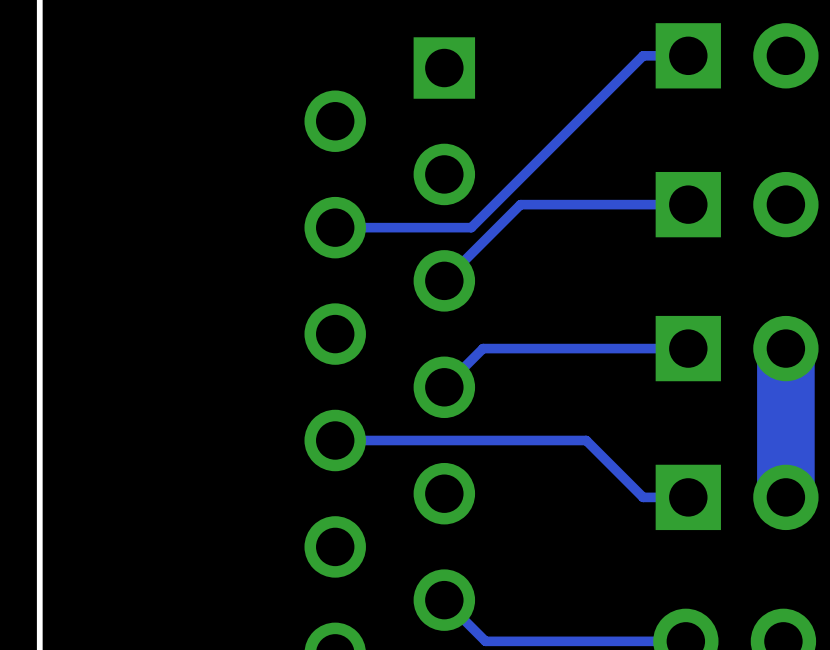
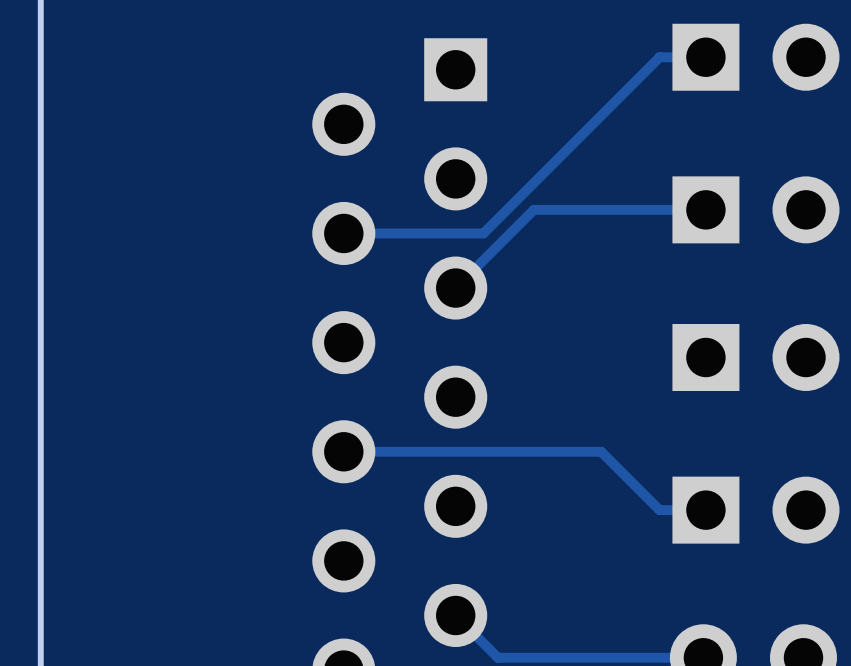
track: (688, 348) (483, 348) (444, 387) -> none
track: (785, 348) (785, 497) -> none

